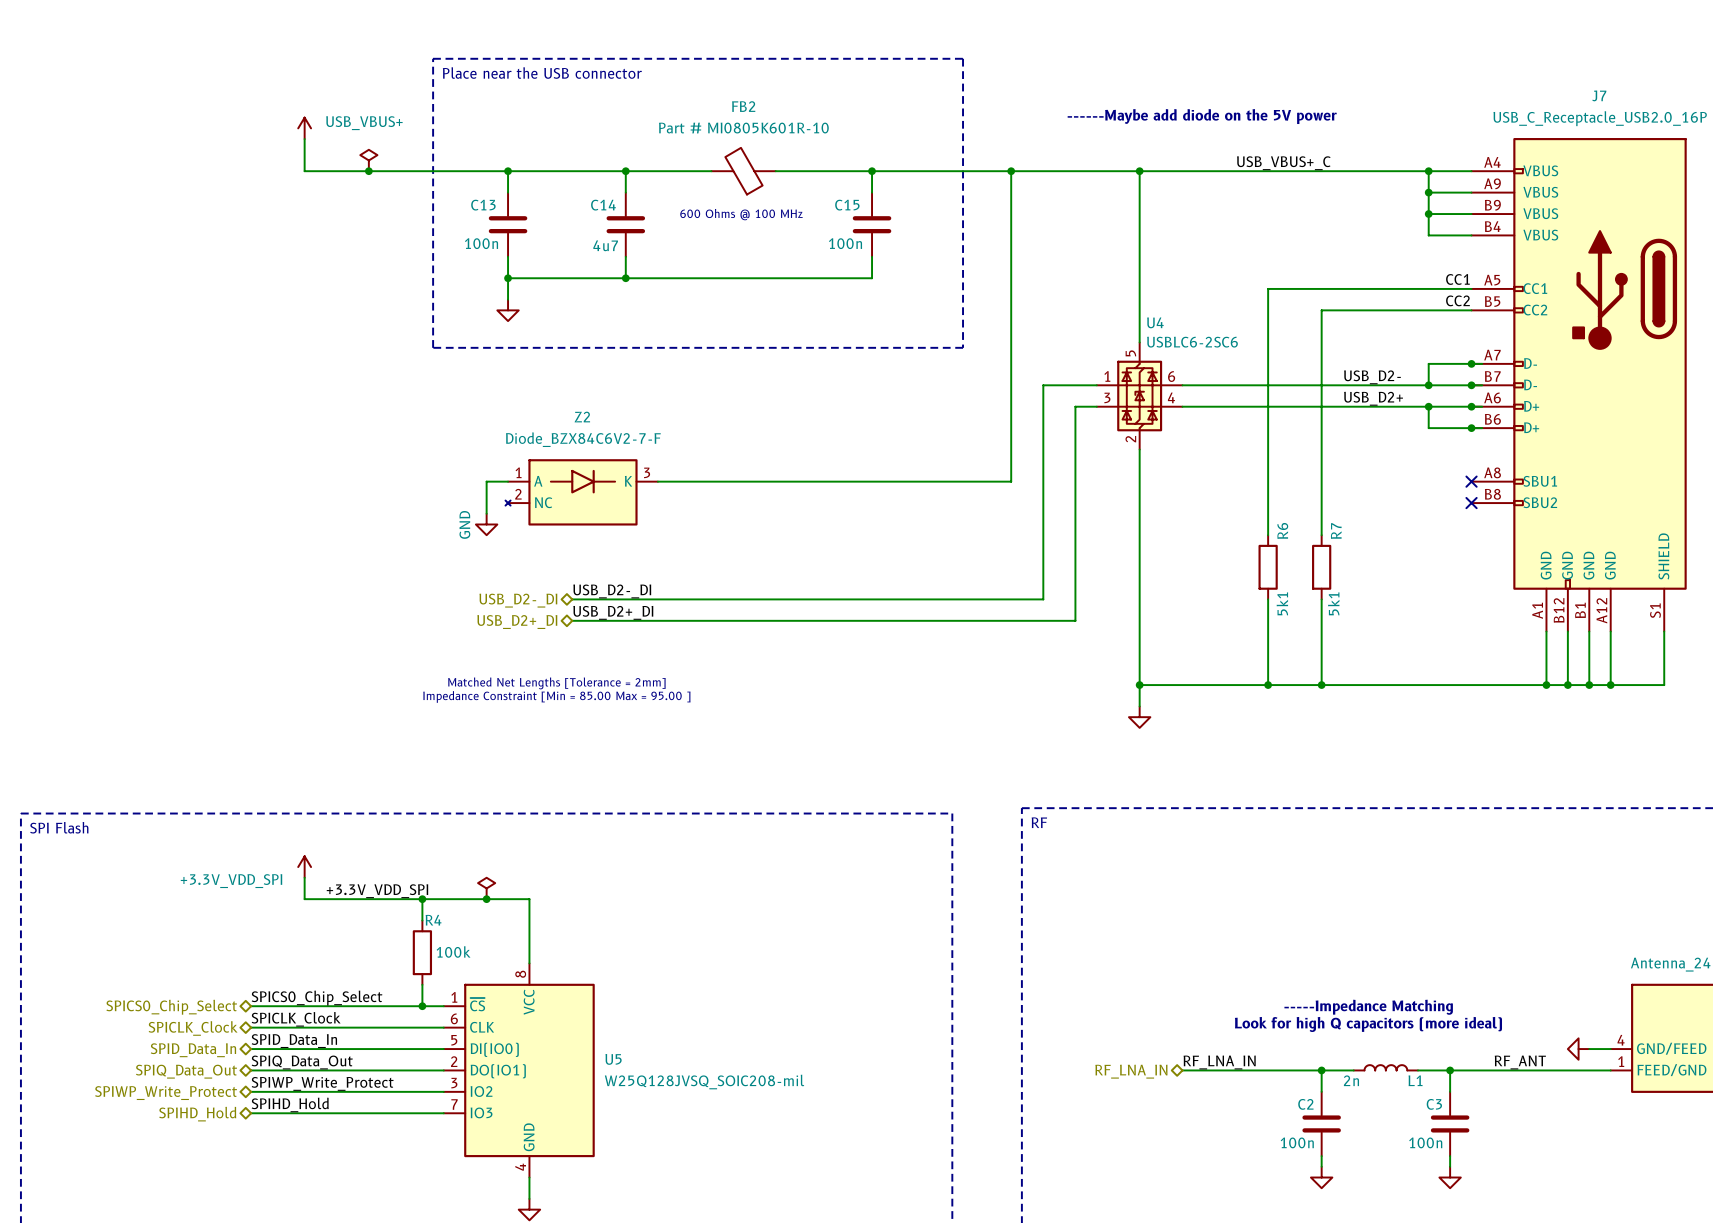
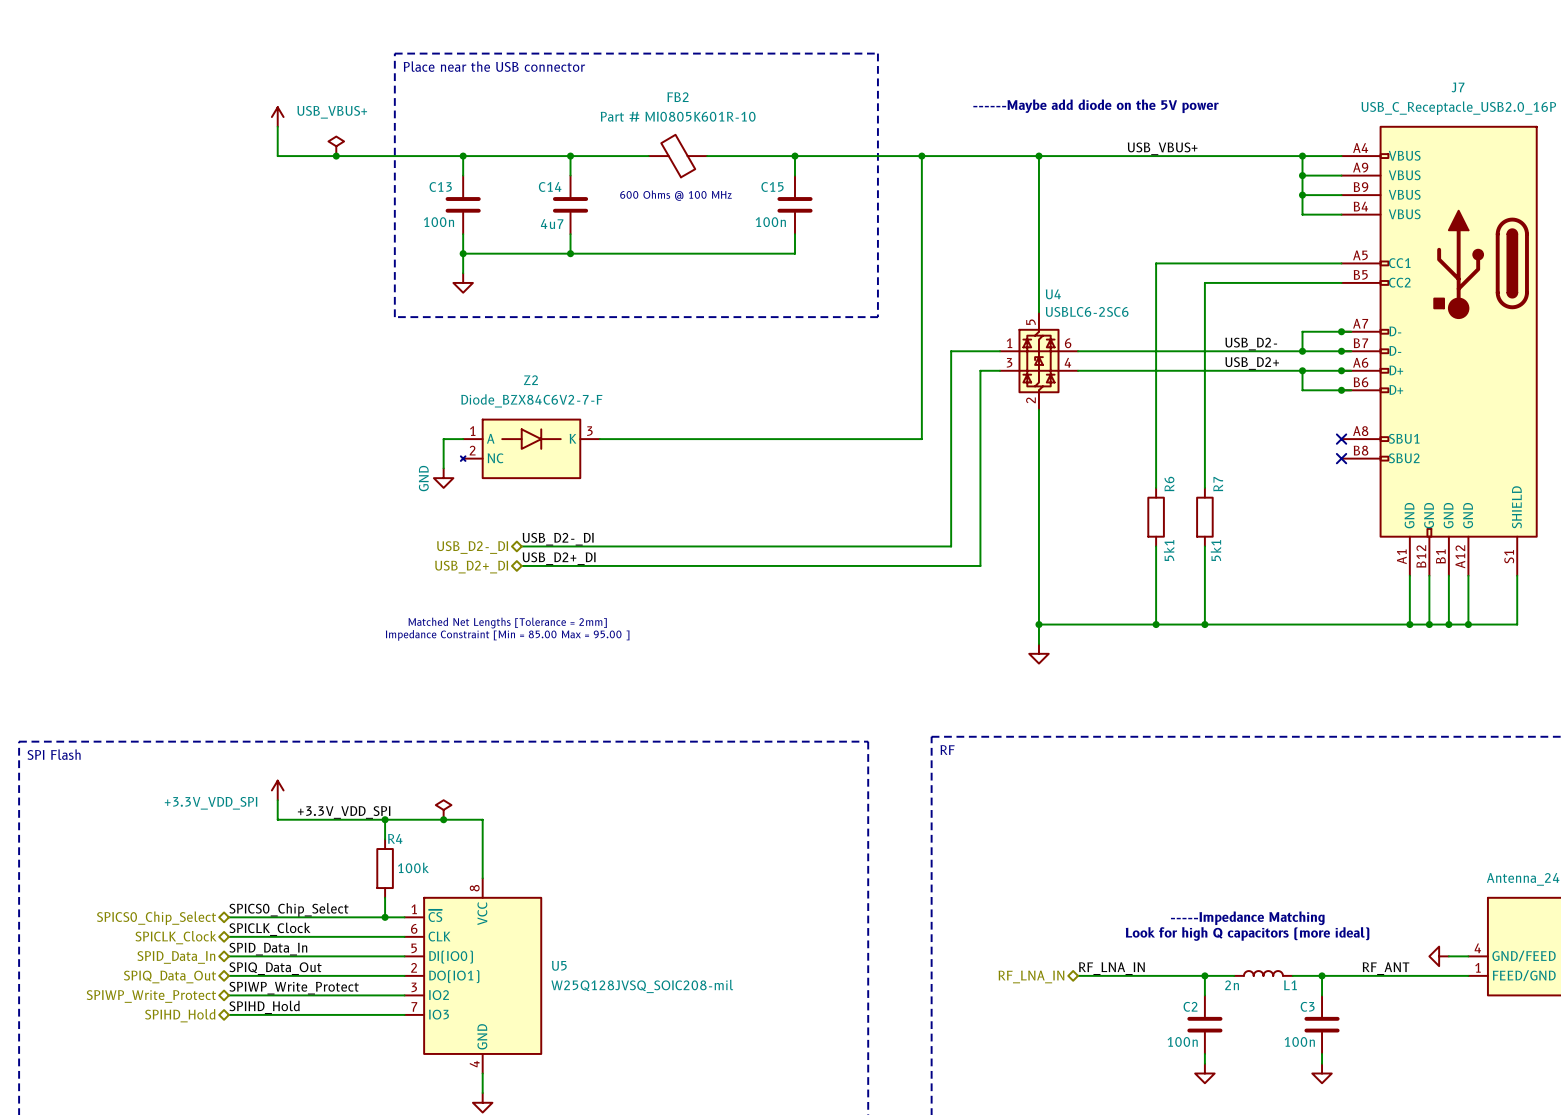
label: USB_VBUS+_C (1283, 163) -> USB_VBUS+ (1162, 148)
label: CC1 (1457, 279) -> none
label: CC2 (1457, 300) -> none

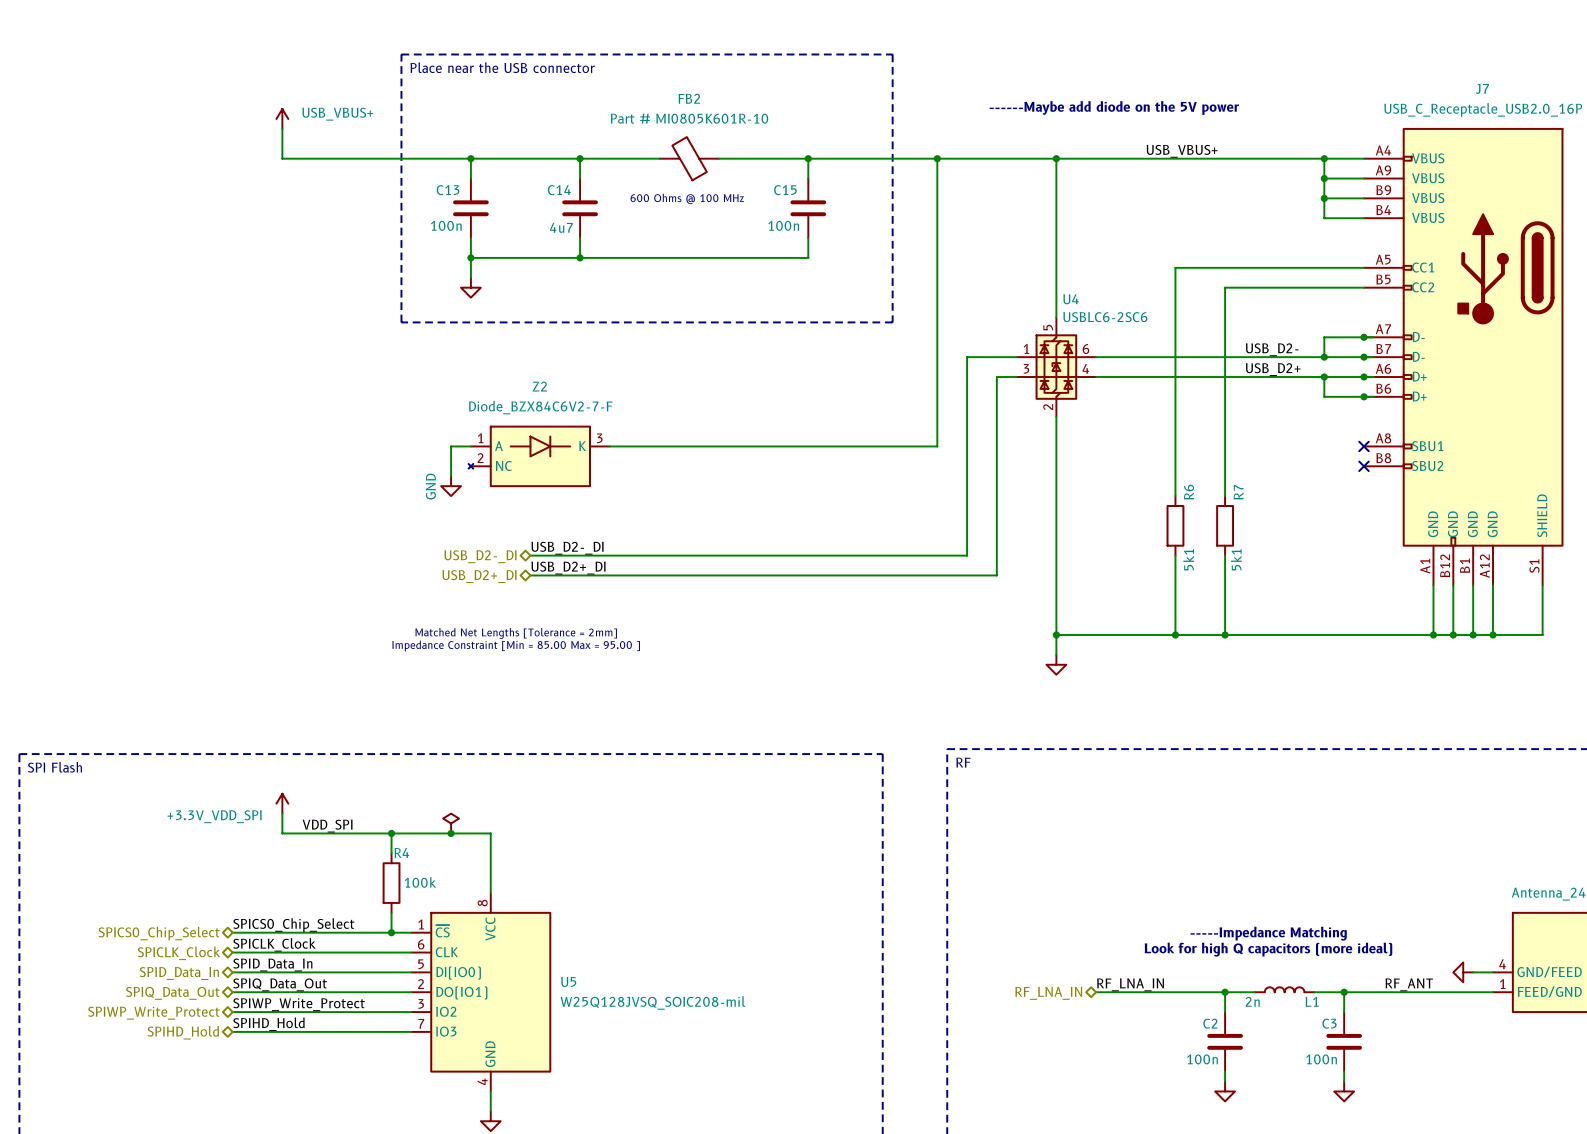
power symbol: (336, 146) -> none
junction: (336, 156) -> none
label: +3.3V_VDD_SPI (344, 812) -> VDD_SPI (327, 826)

